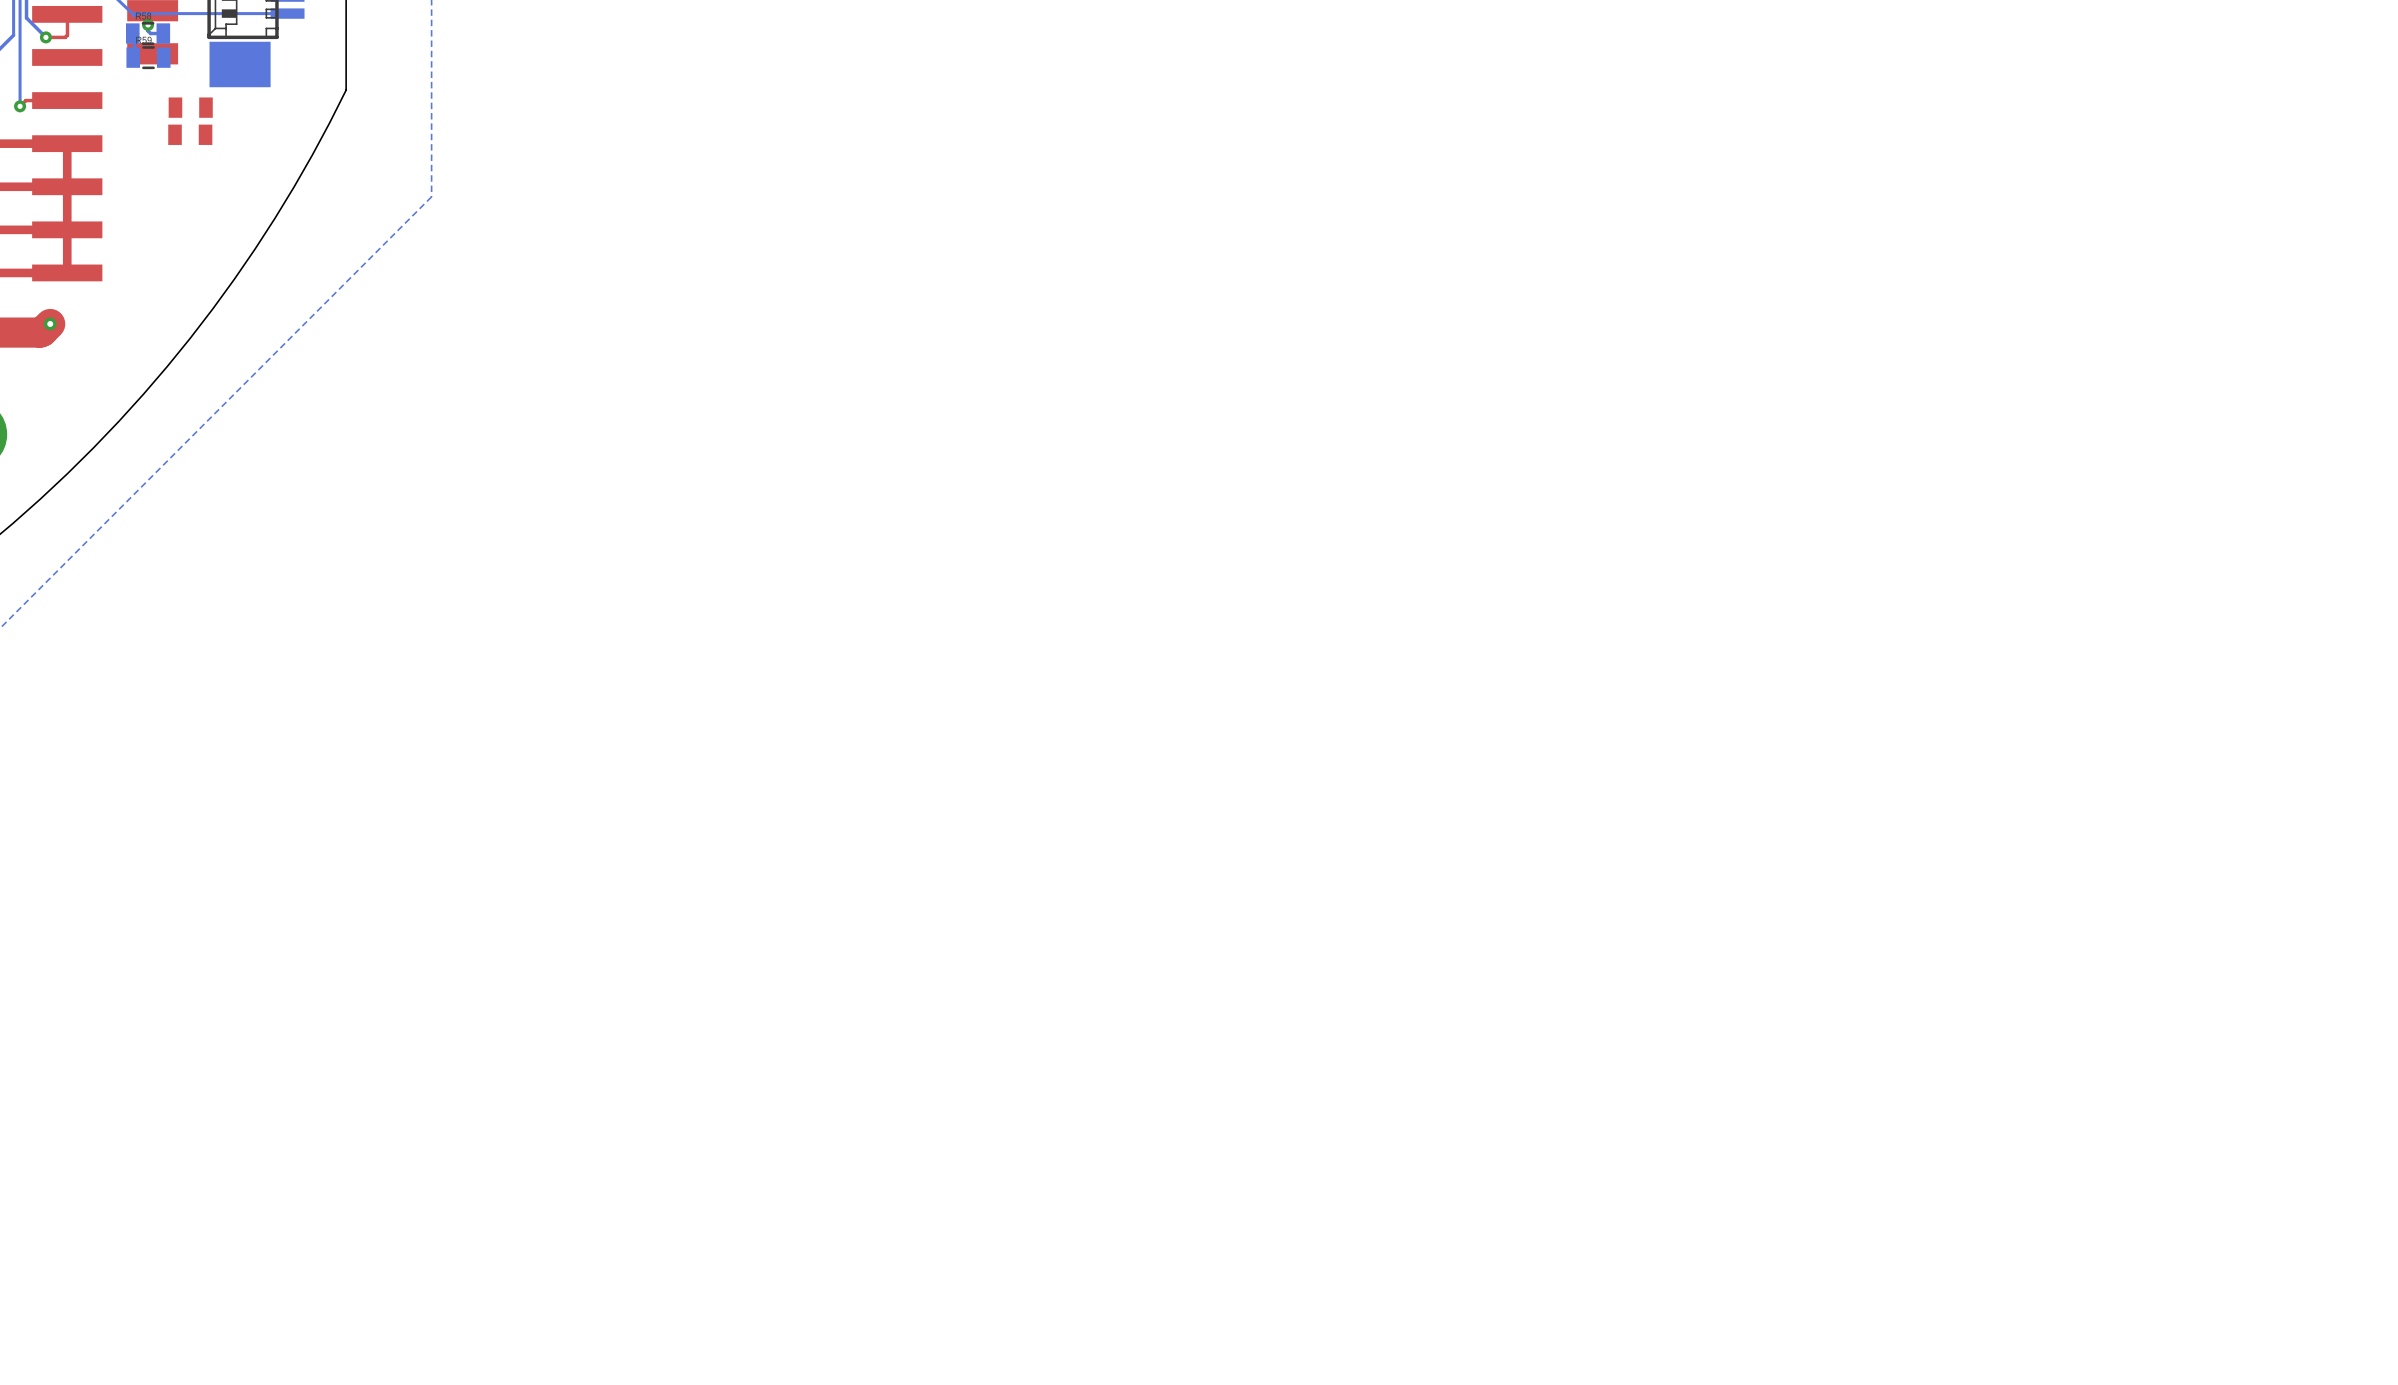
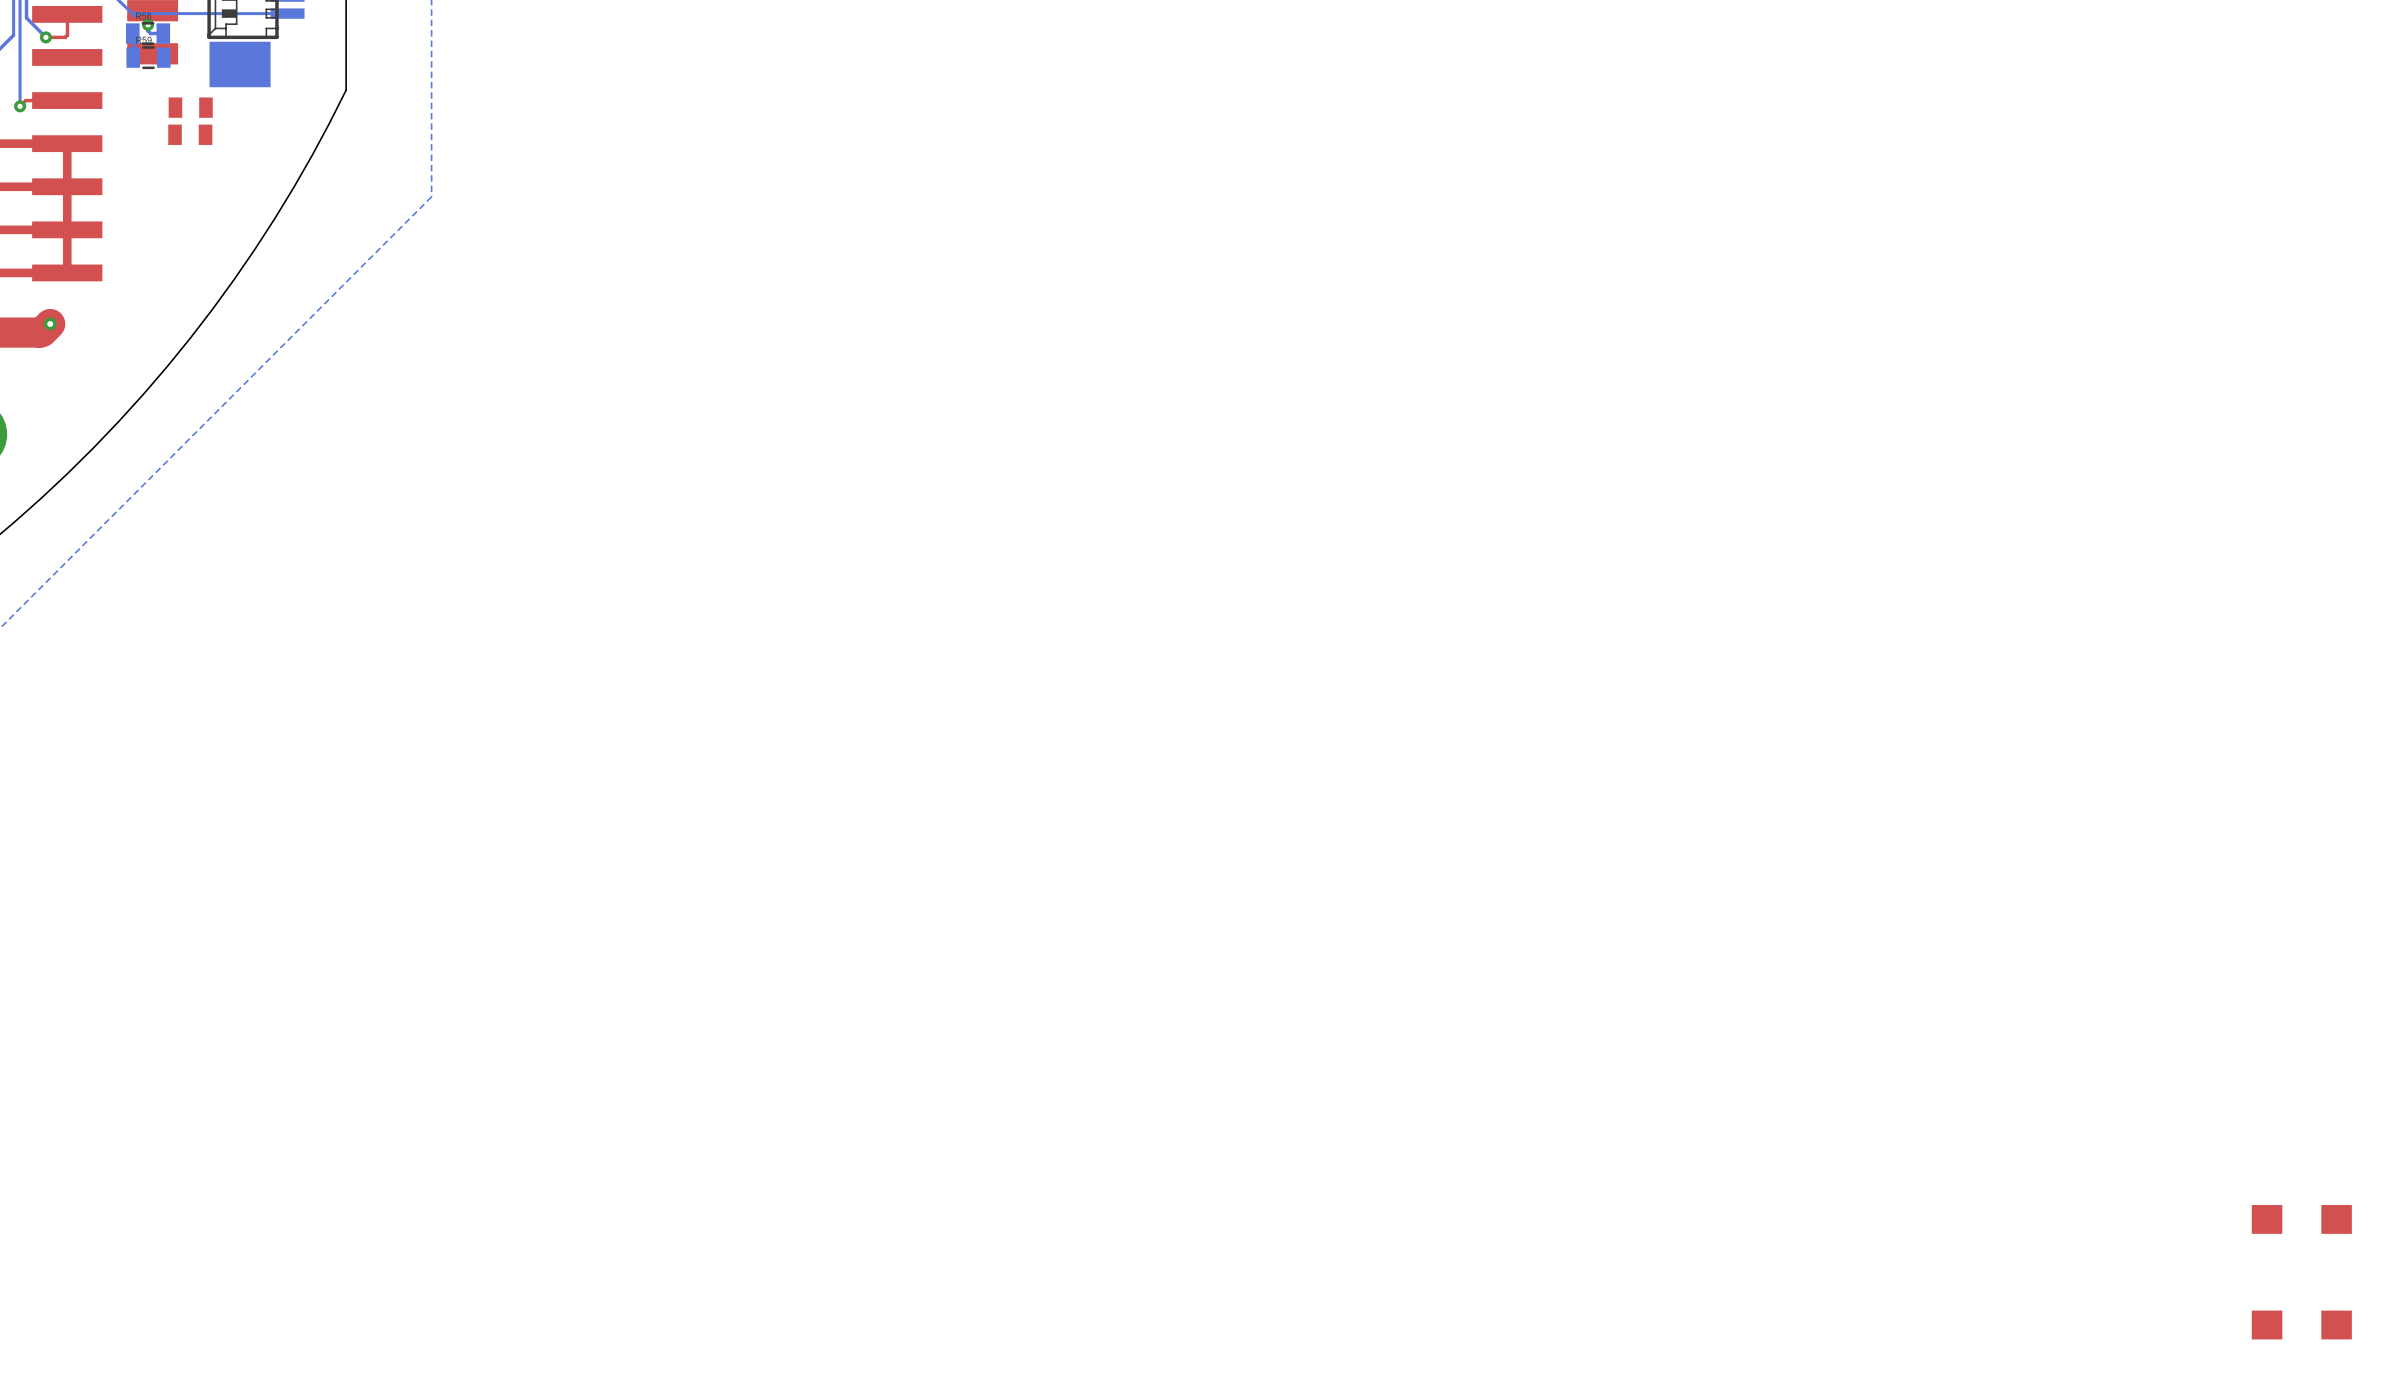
part: none -> (2301, 1219)
part: none -> (2301, 1325)

